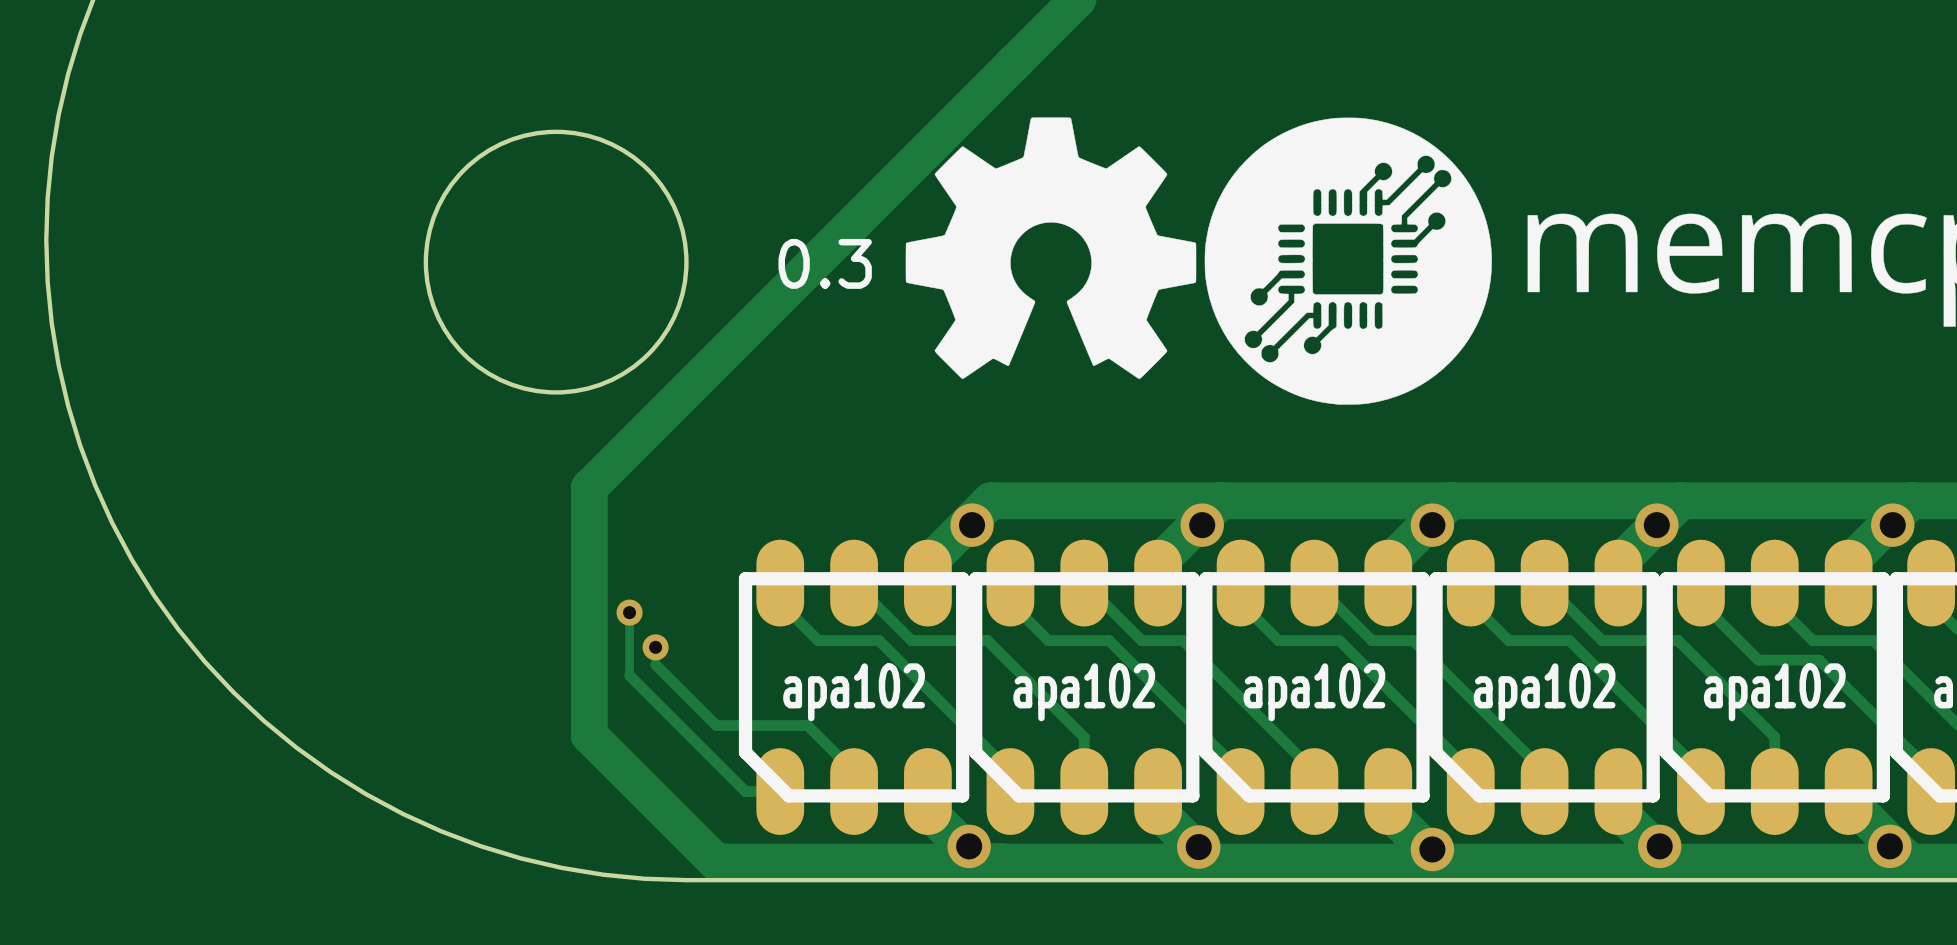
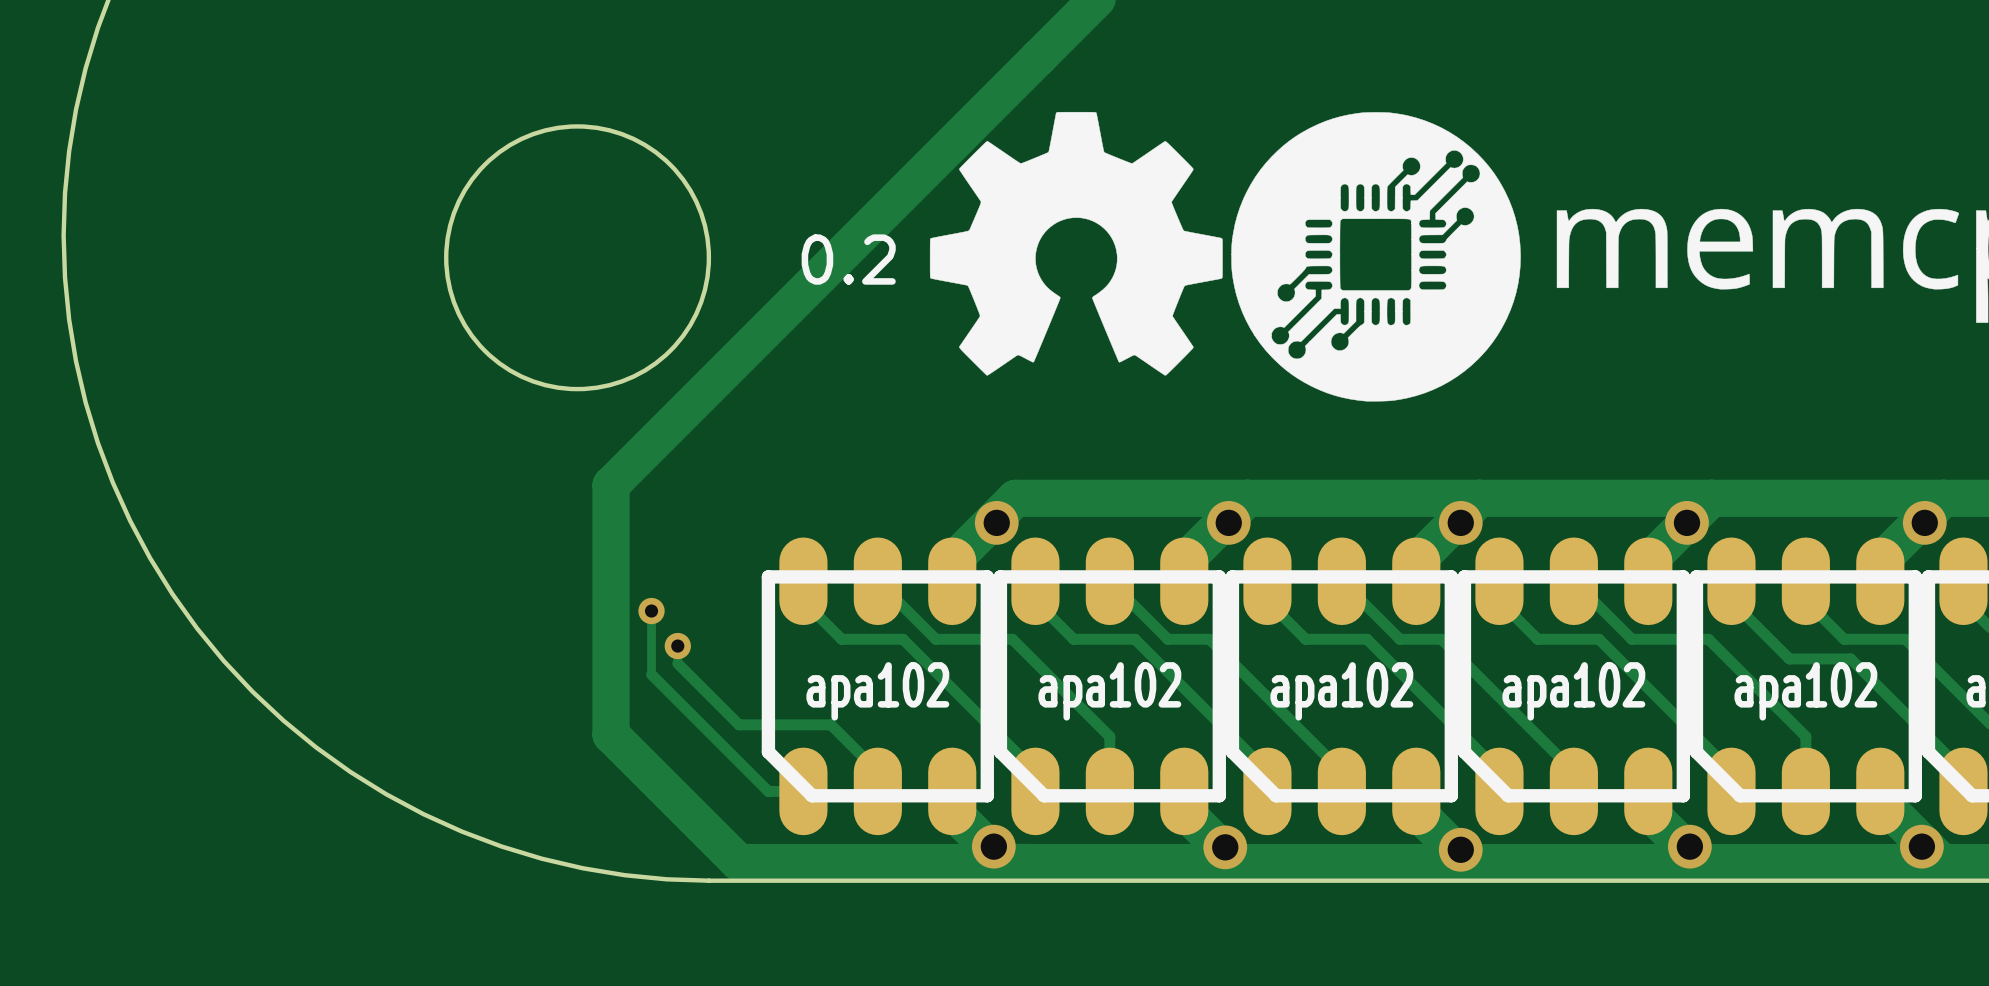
text: 0.3 (825, 263) -> 0.2 (848, 259)

